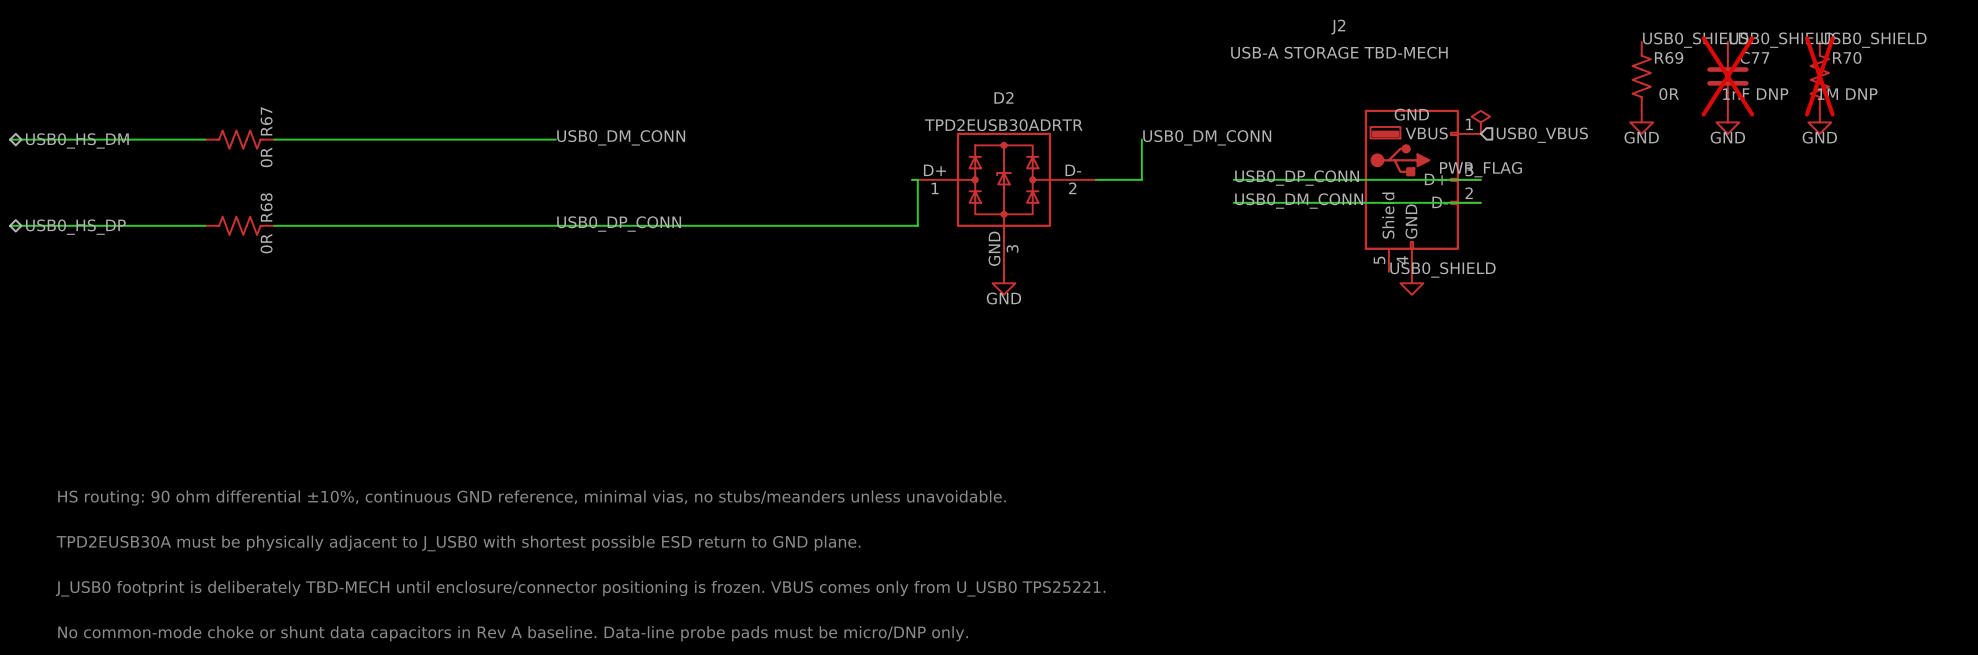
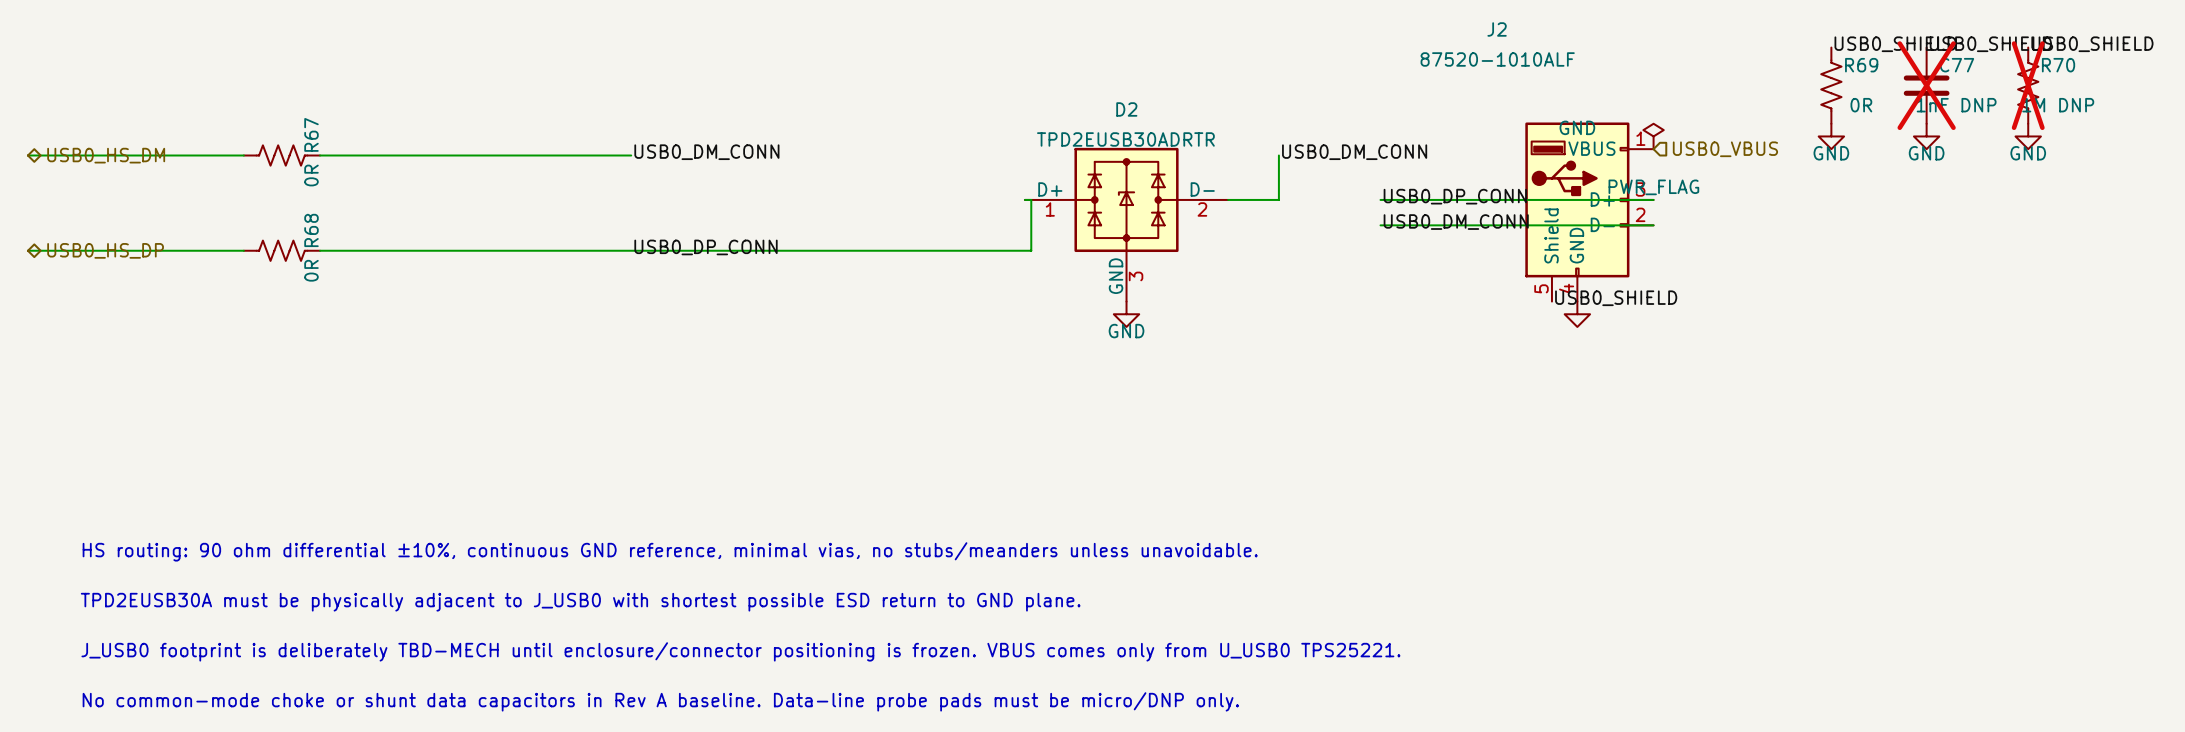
J2 value: USB-A STORAGE TBD-MECH (1339, 52) -> 87520-1010ALF (1497, 59)

